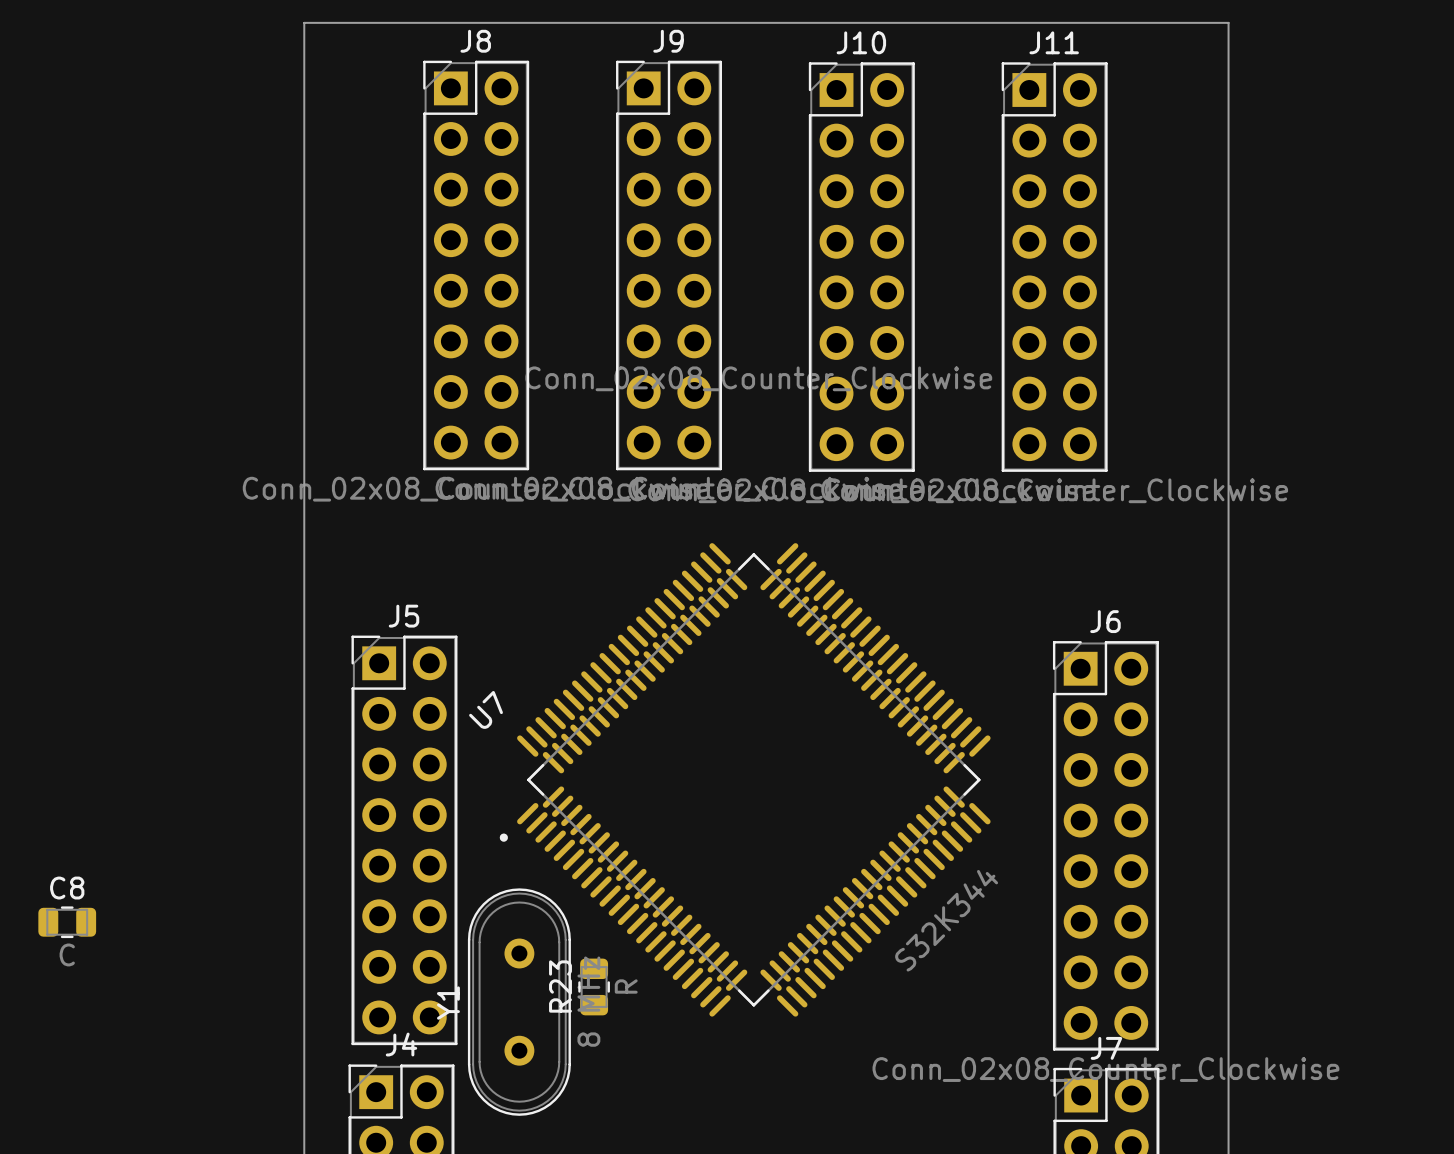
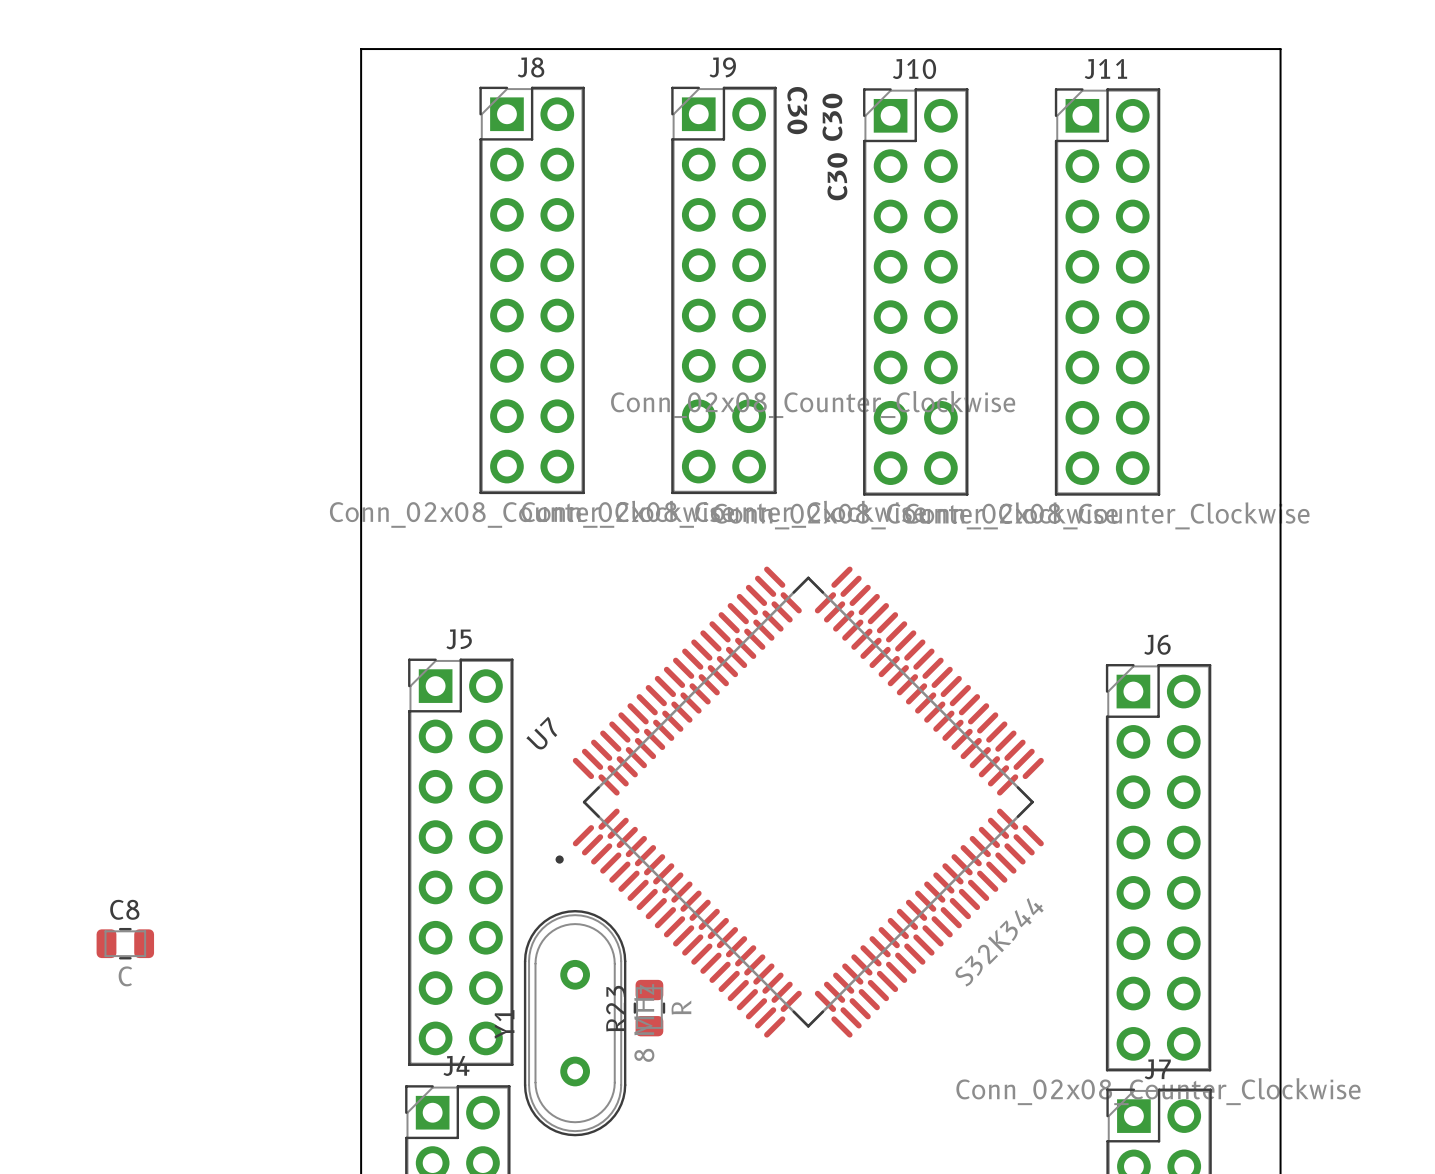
text: none -> C30 (832, 117)
text: none -> C30 (797, 110)
text: none -> C30 (837, 176)

